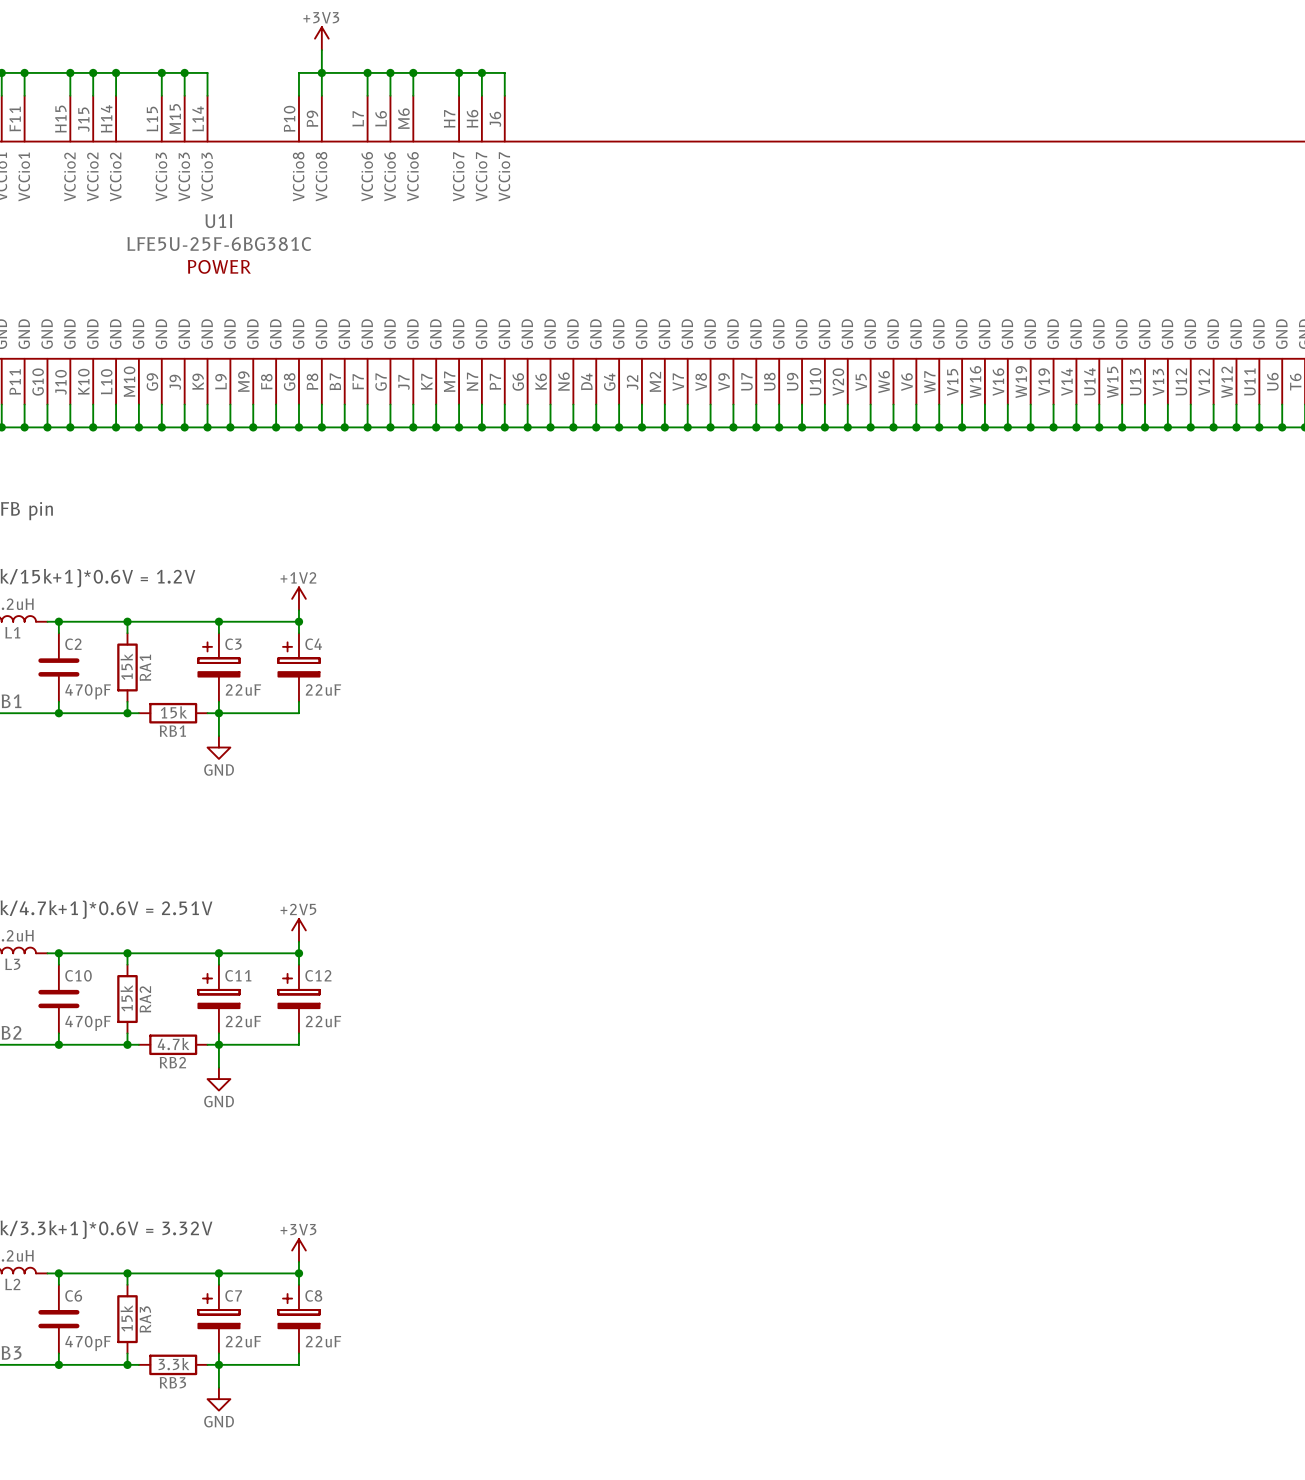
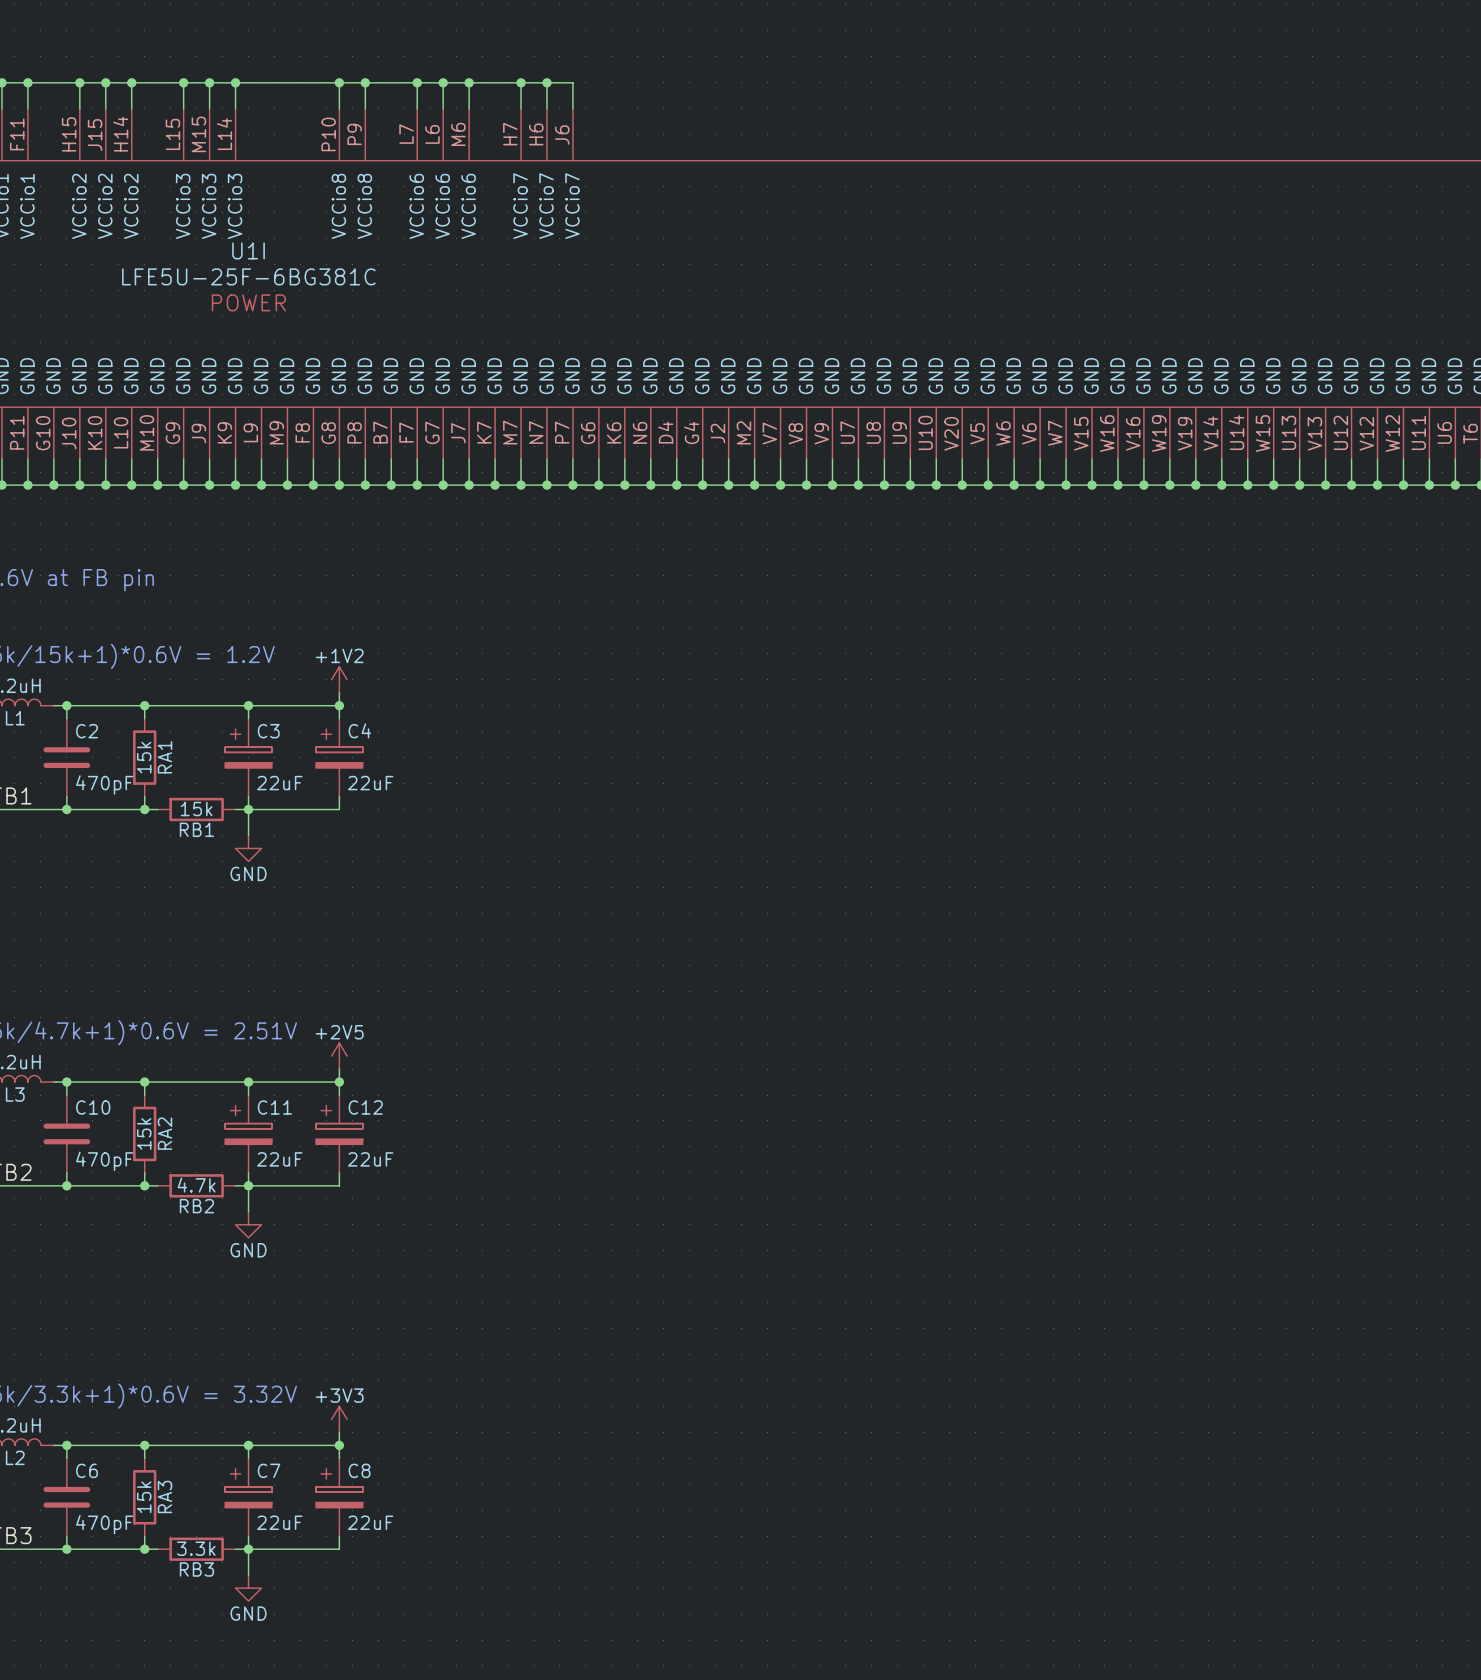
power symbol: +3V3 (321, 38) -> none
wire: (321, 50) (321, 72) -> none
wire: none -> (235, 82) (339, 82)
junction: none -> (235, 82)
junction: none -> (339, 82)

